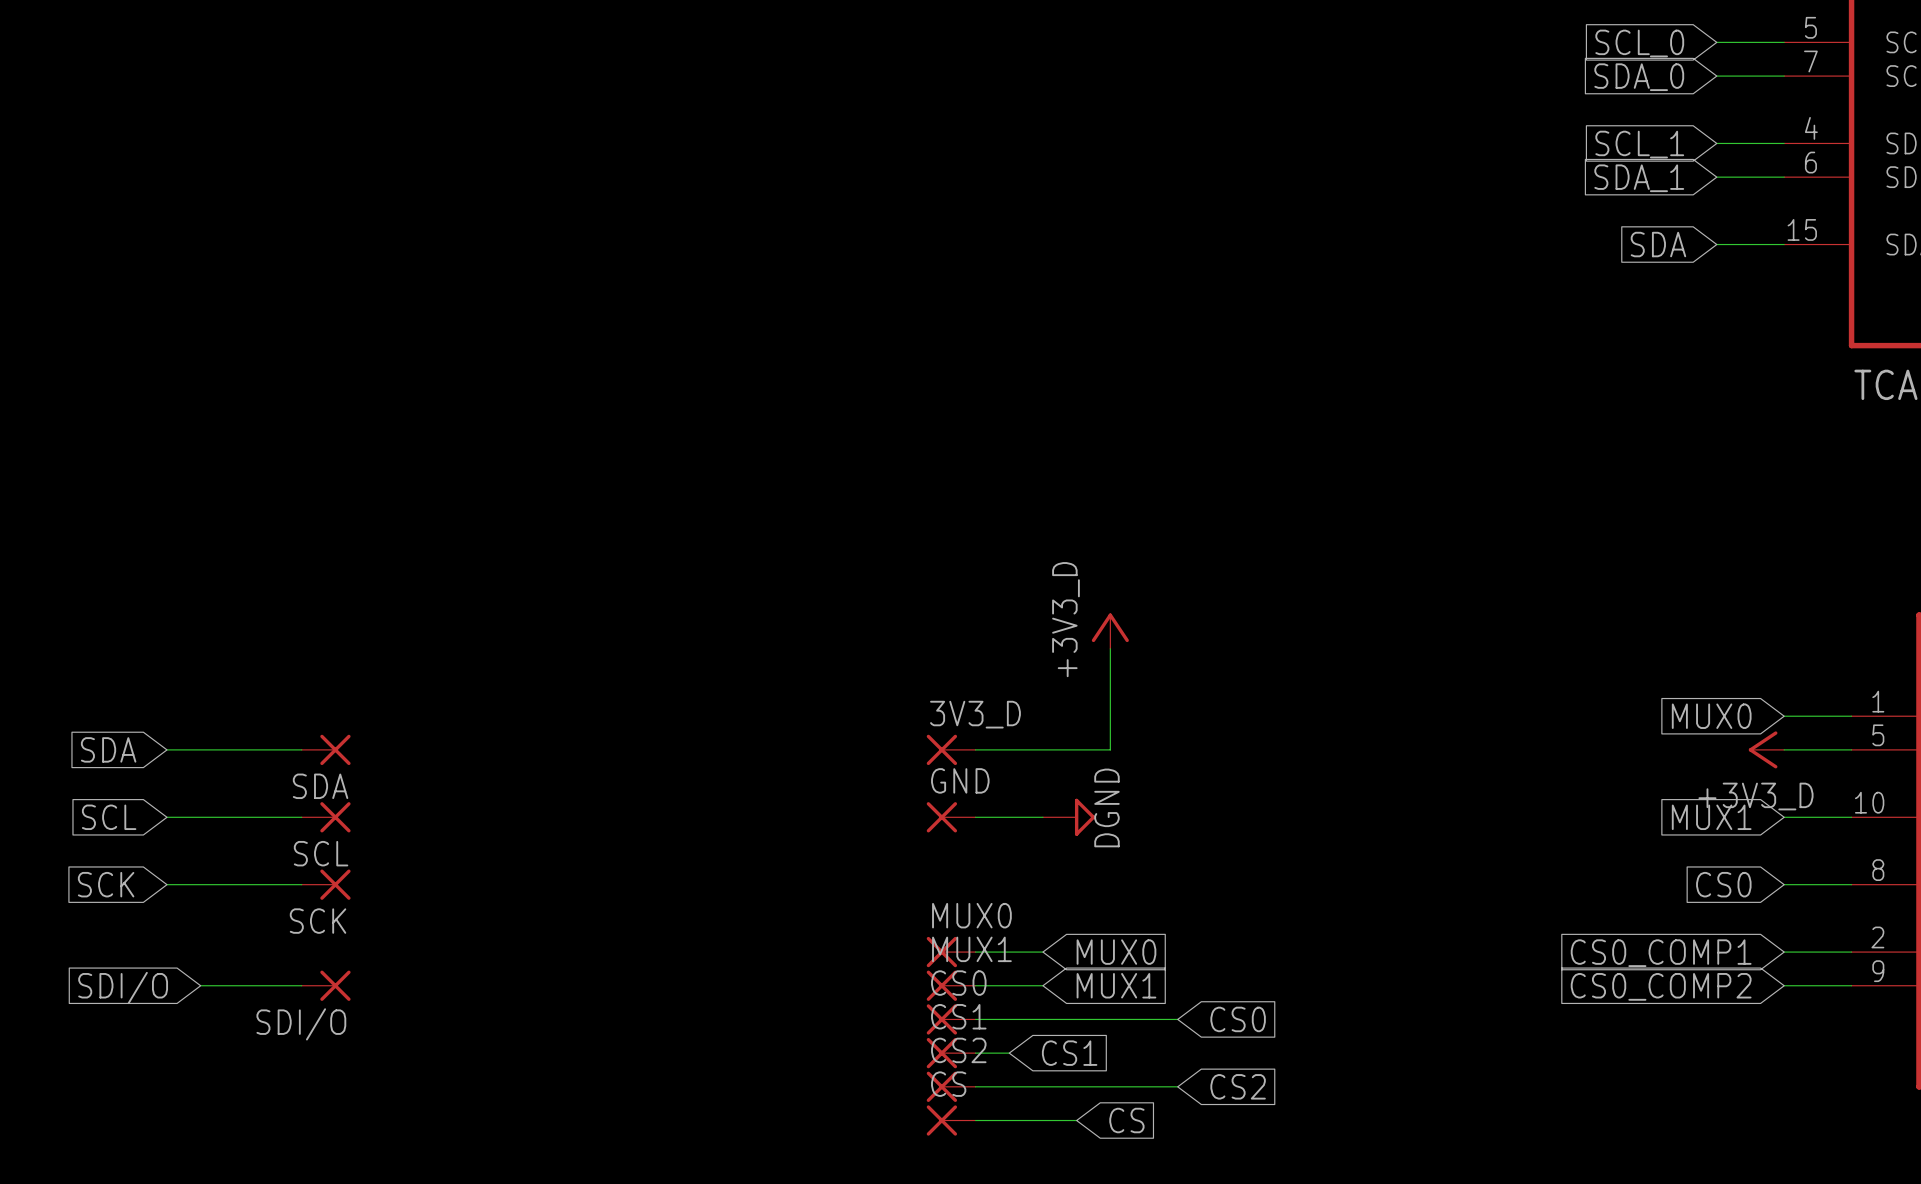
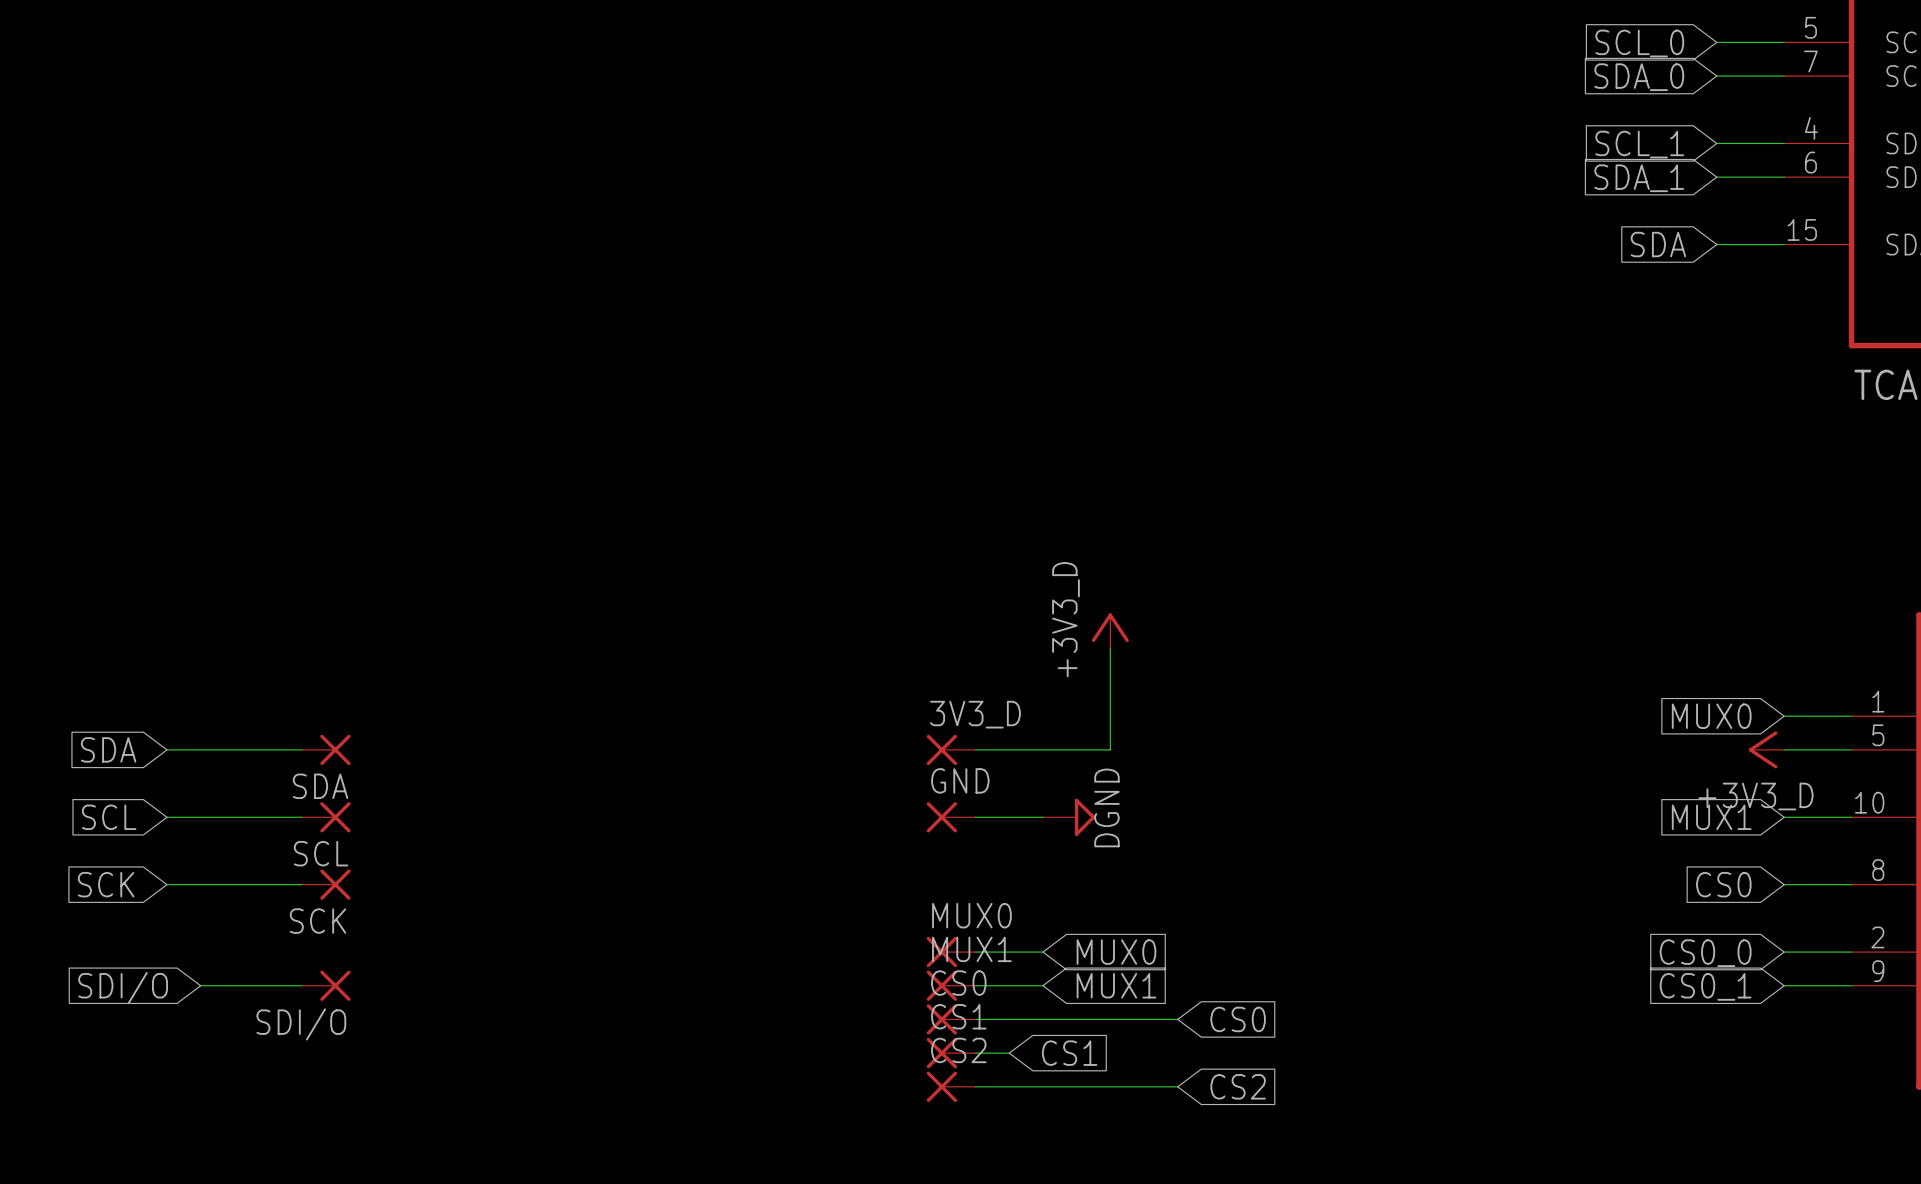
global label: CS0_COMP1 (1661, 953) -> CS0_0 (1705, 953)
global label: CS0_COMP2 (1661, 986) -> CS0_1 (1705, 986)
CS: (951, 1120) -> none
wire: (975, 1120) (1076, 1120) -> none
global label: CS (1126, 1120) -> none

